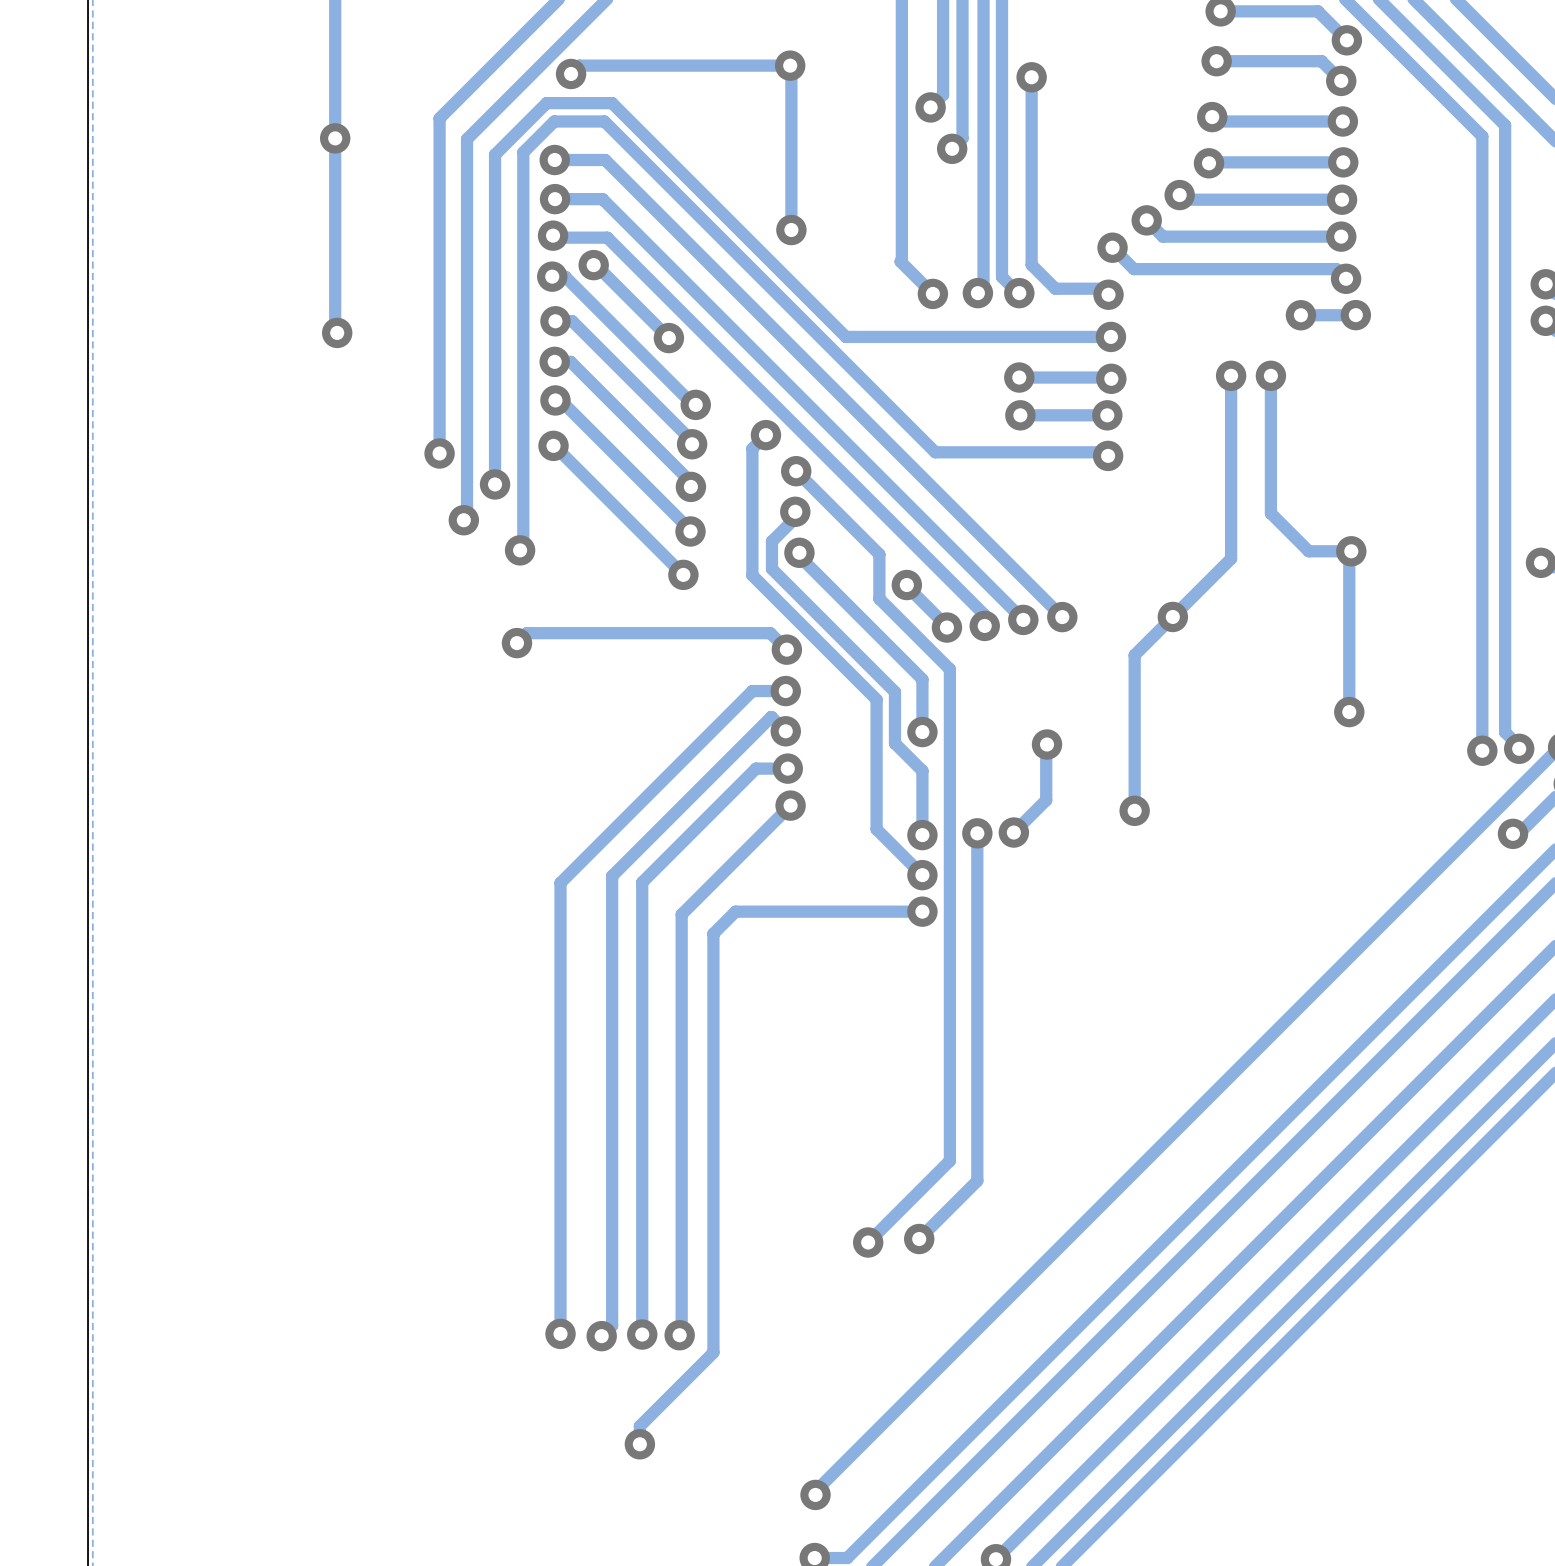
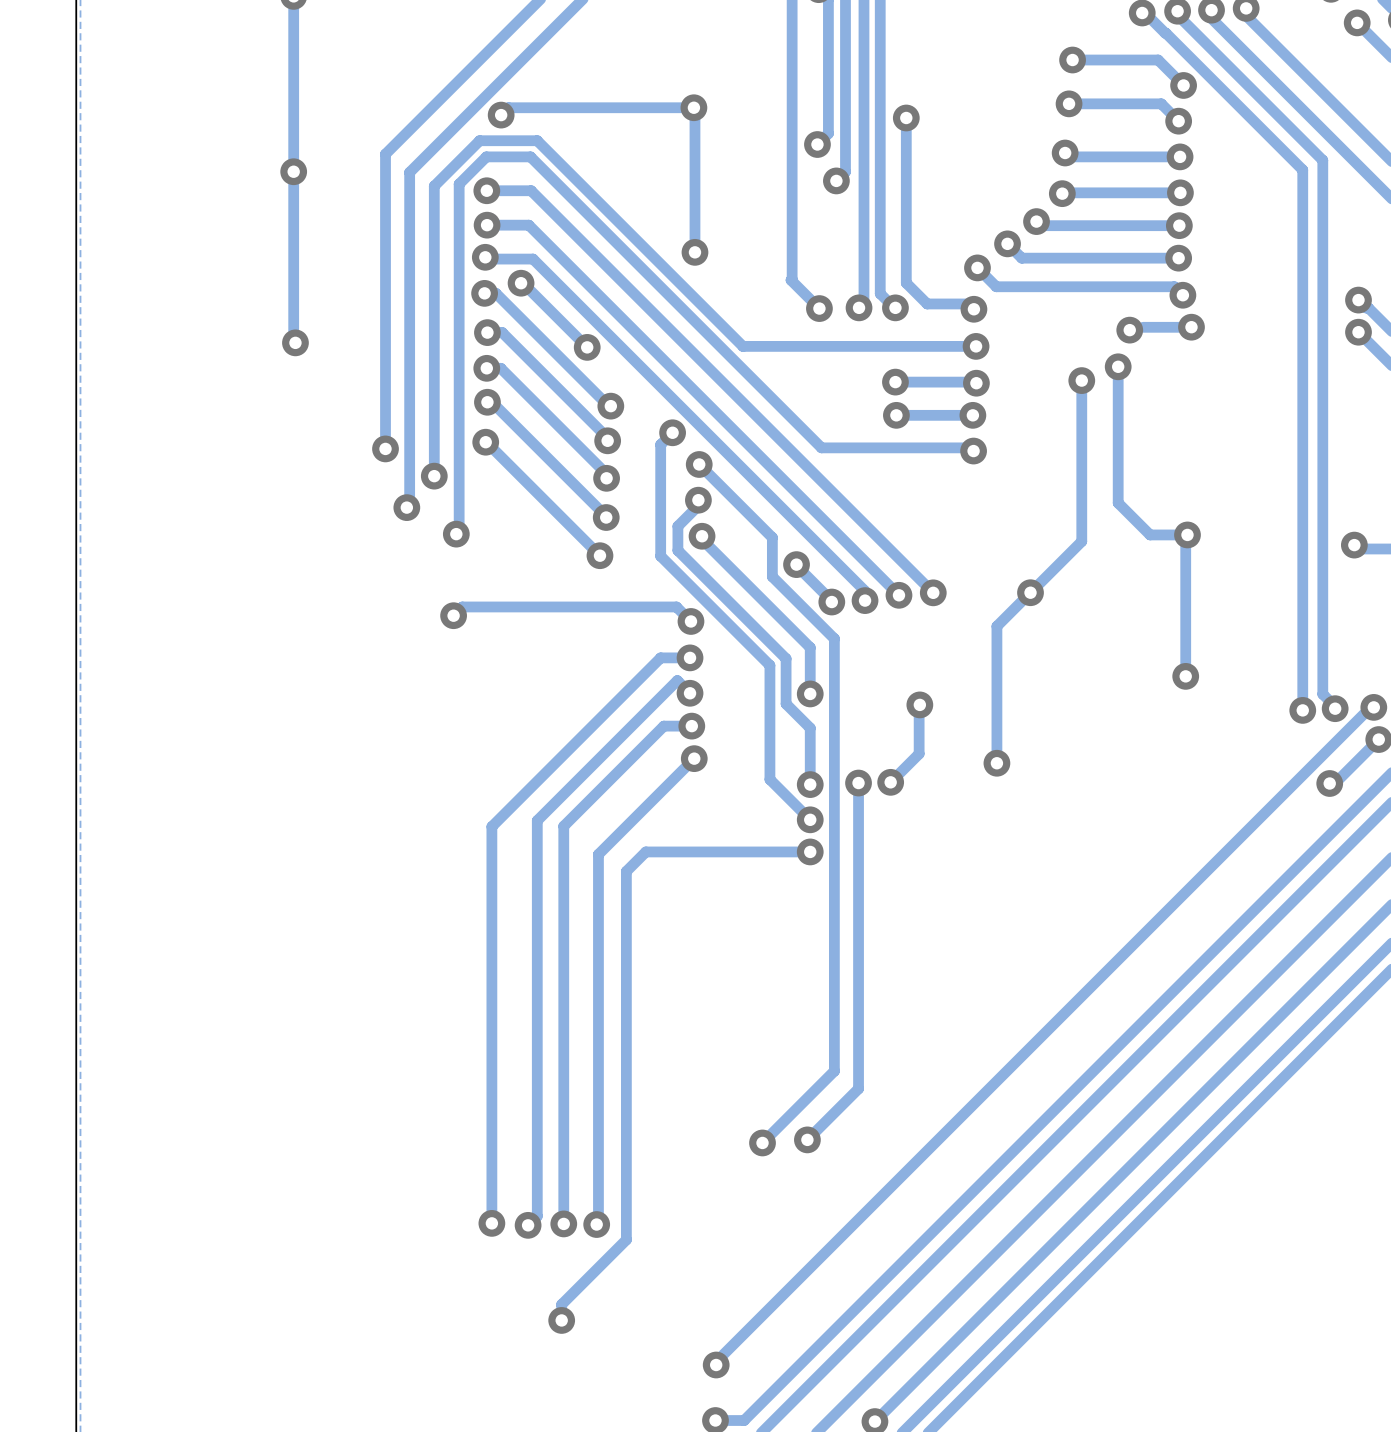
via position: (1300, 315) -> (1129, 330)
track: (1270, 375) (1270, 513) (1272, 515) -> (1118, 366) (1118, 503)
via position: (1270, 375) -> (1118, 366)

